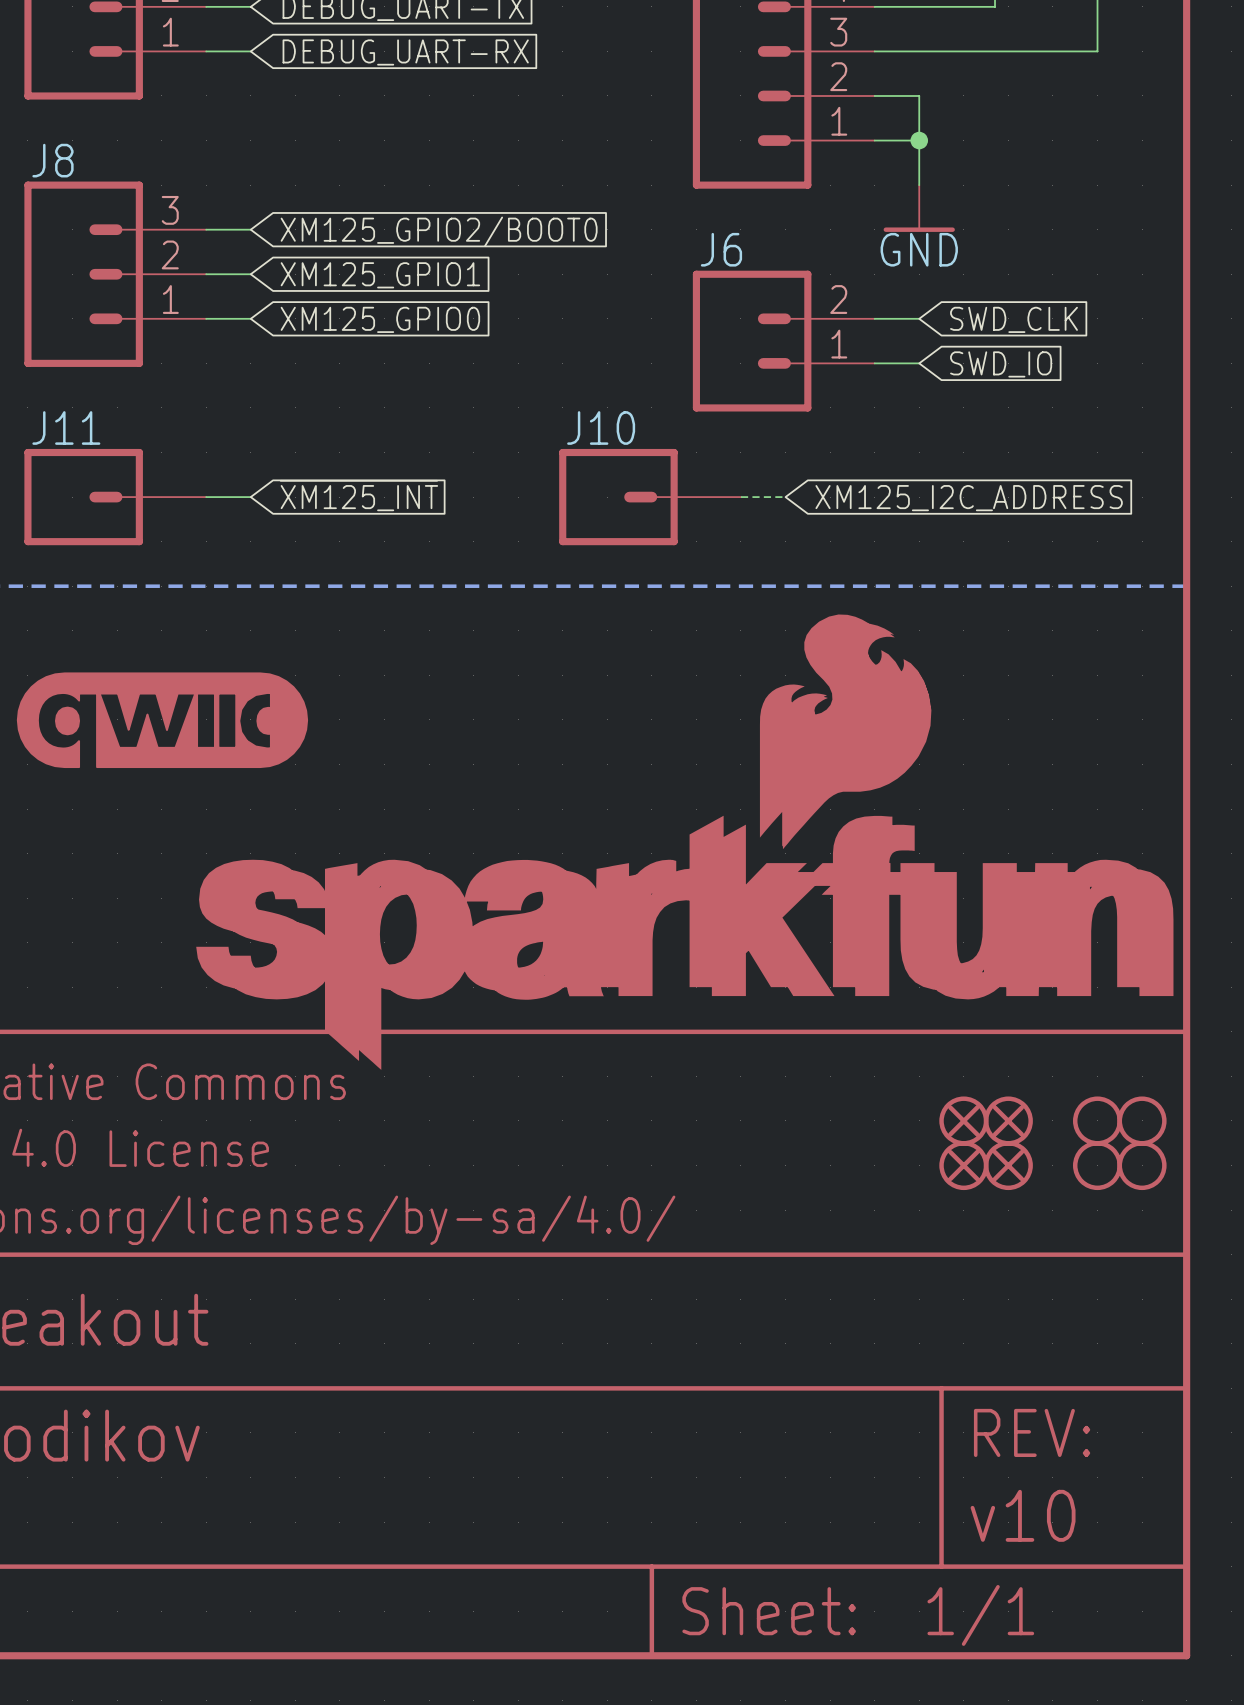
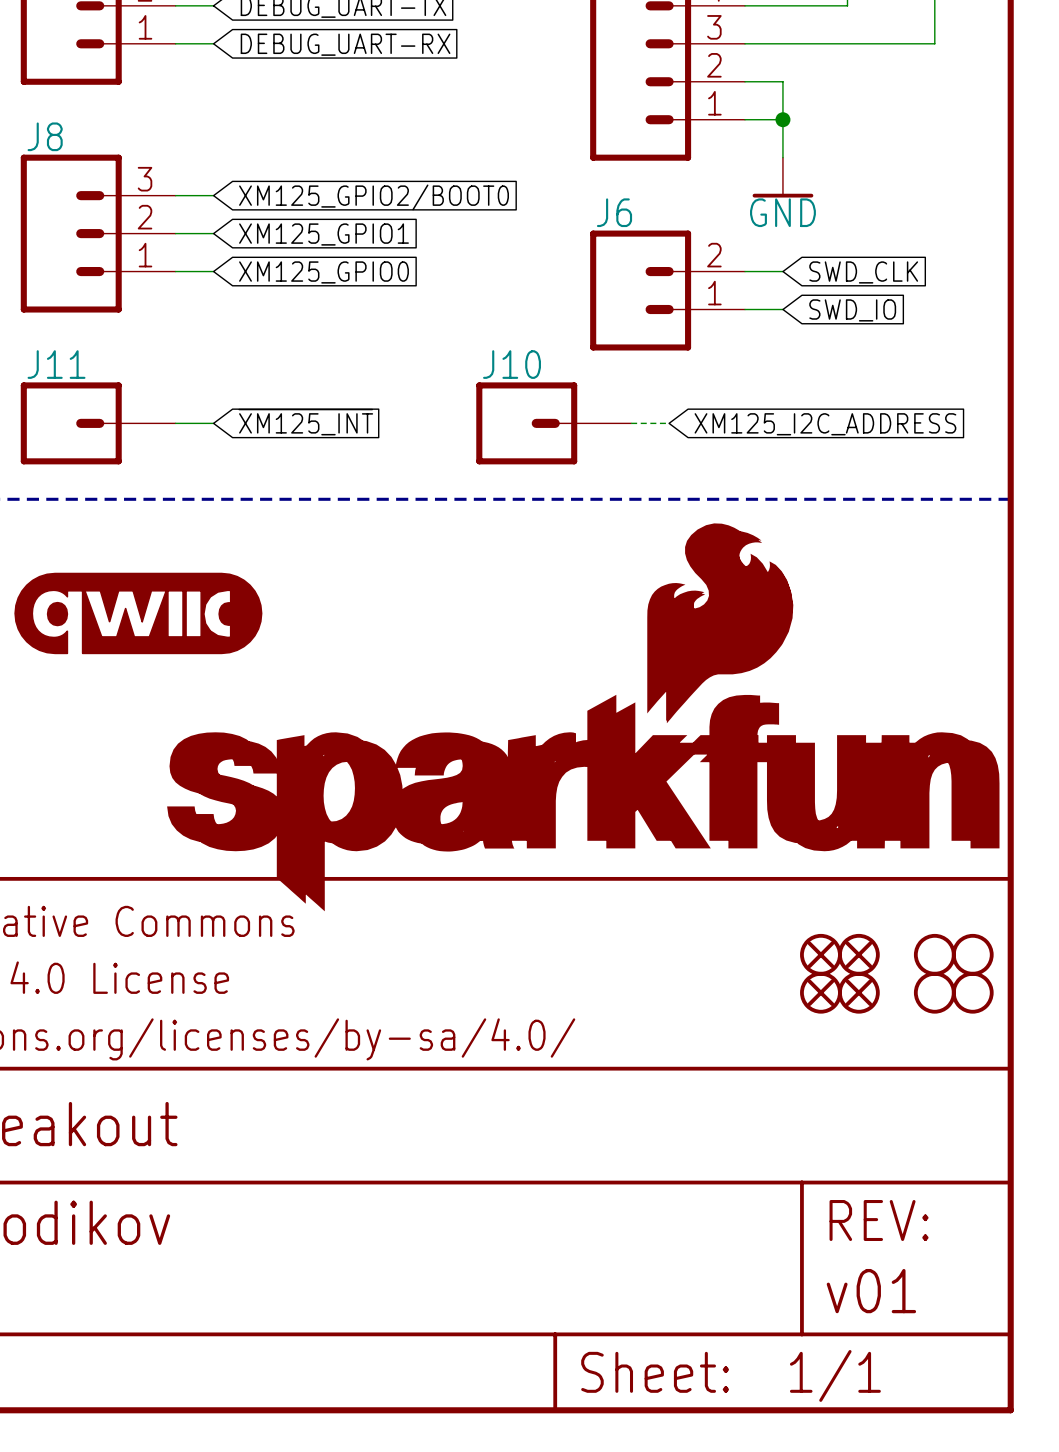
part text: v10 (1023, 1515) -> v01 (871, 1291)

